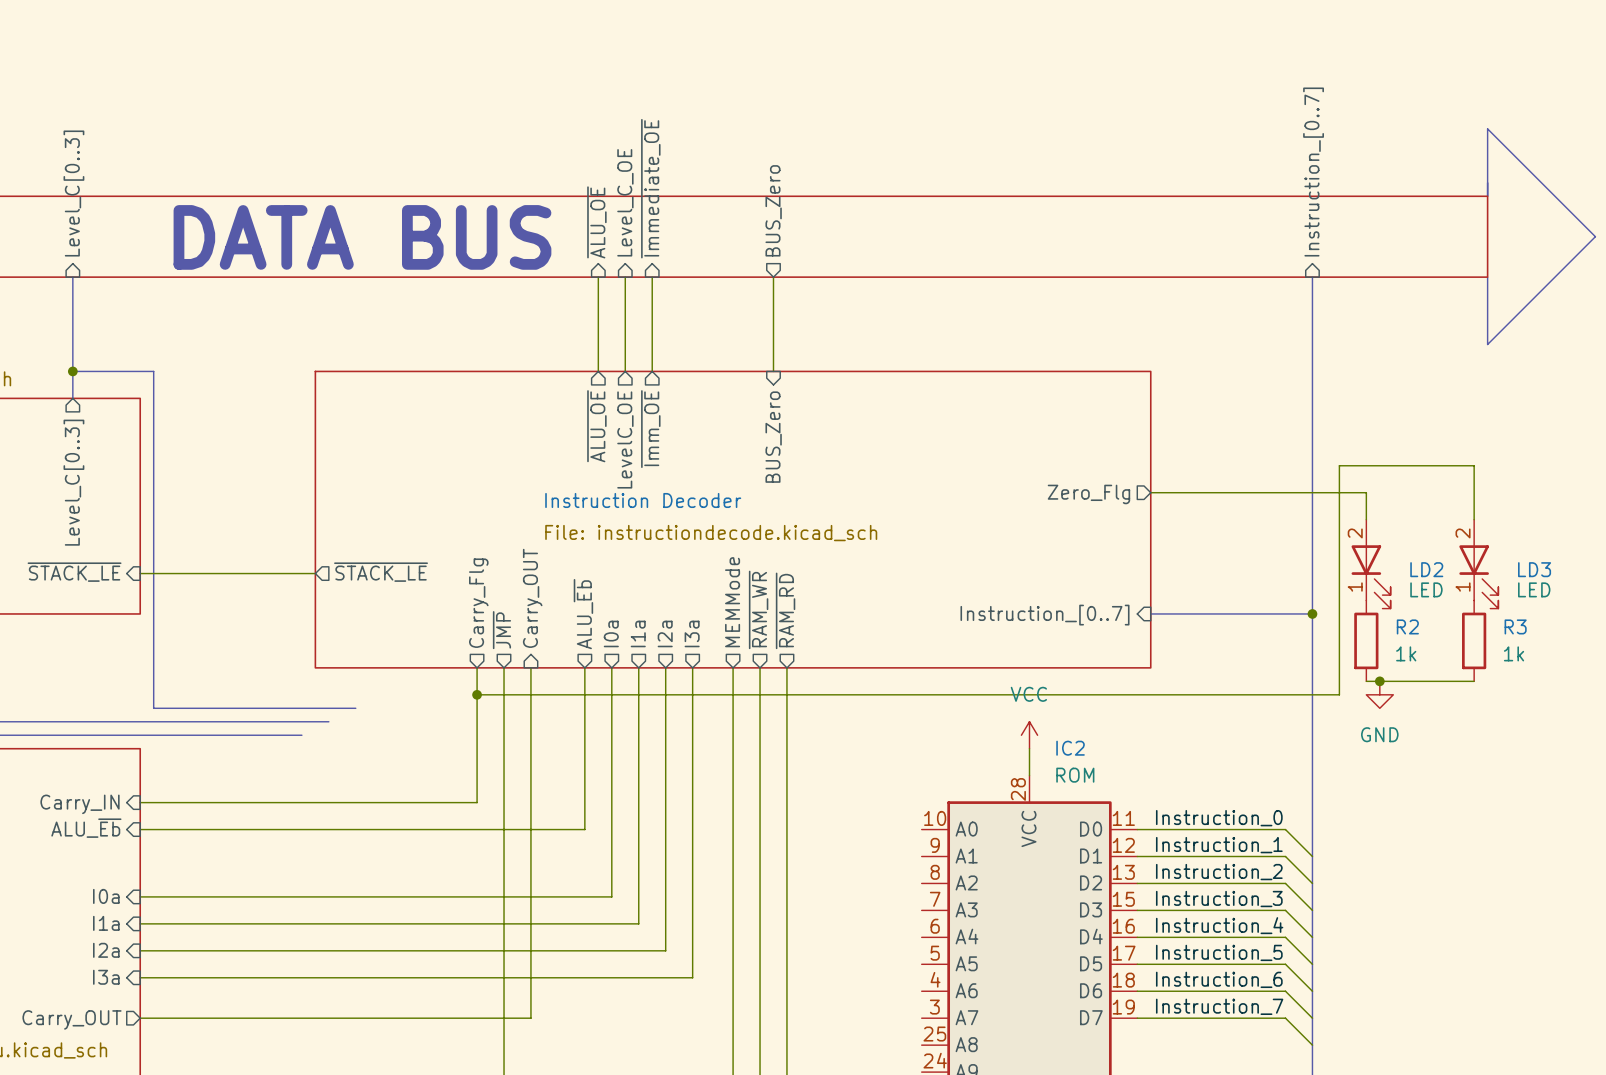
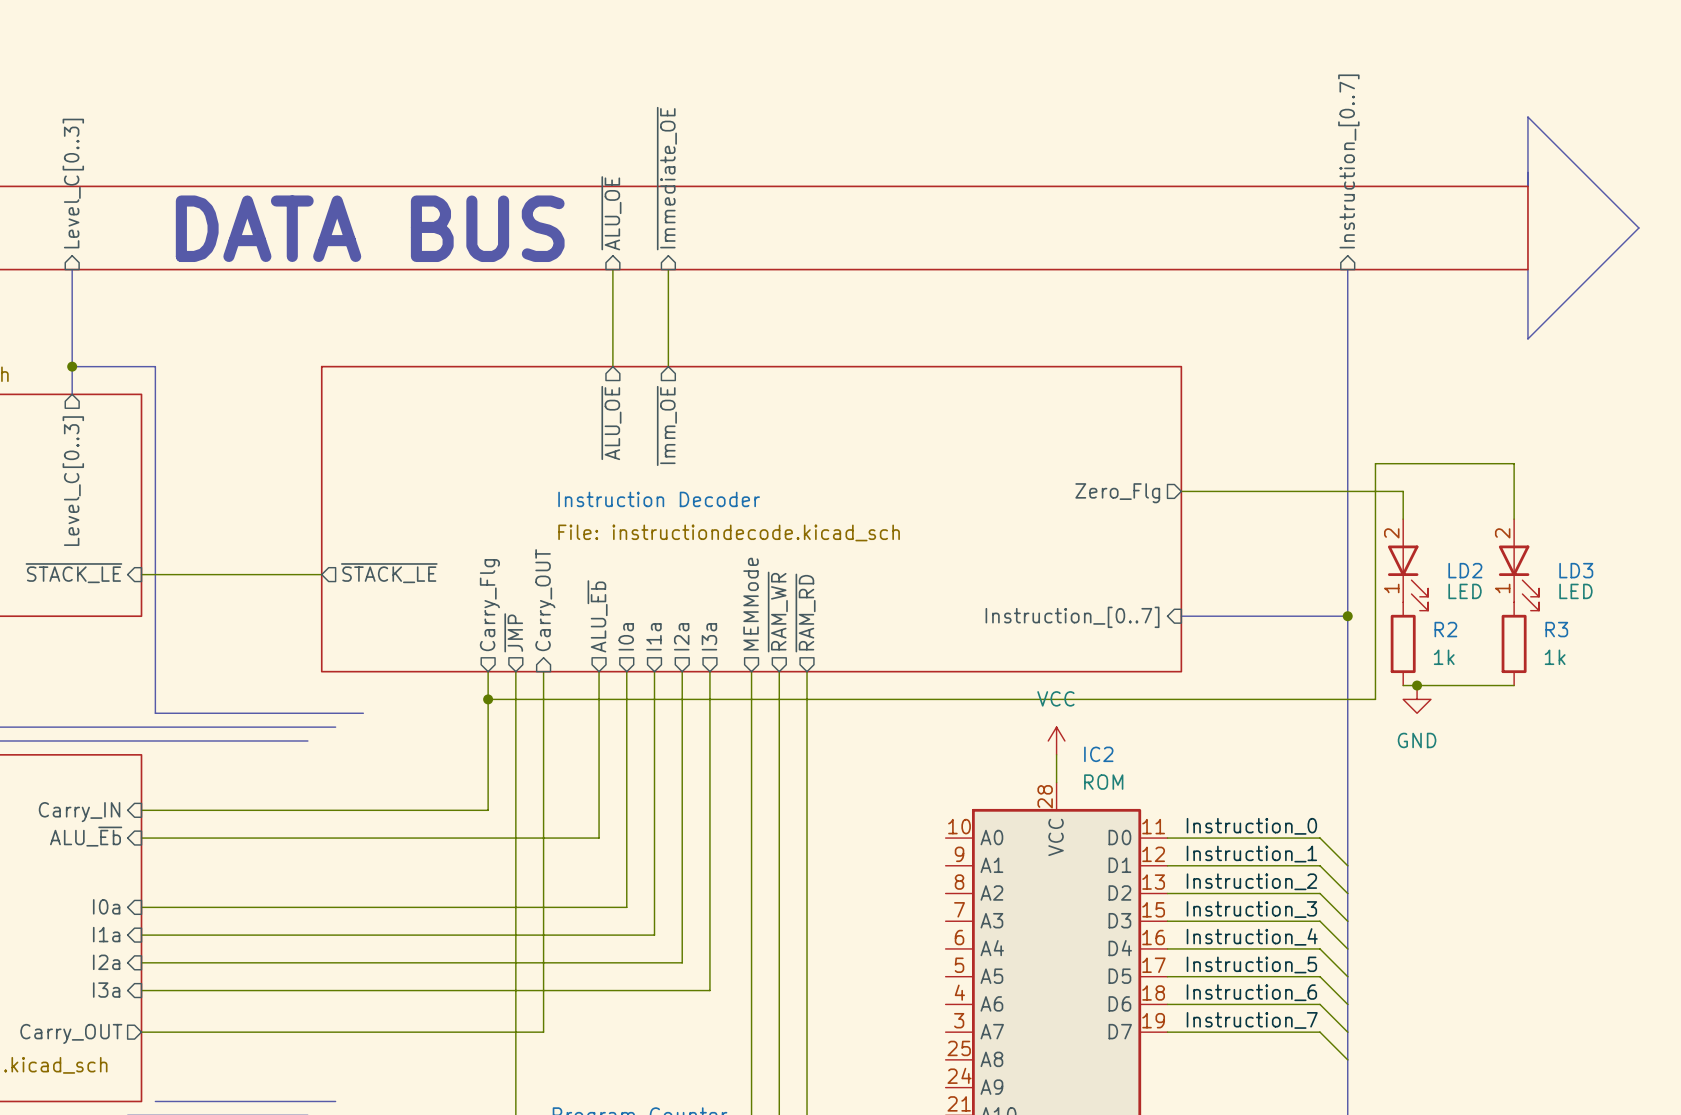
sheet pin: Level_C_OE (625, 202) -> none
sheet pin: BUS_Zero (773, 210) -> none
wire: (625, 277) (625, 371) -> none
wire: (773, 277) (773, 371) -> none
sheet pin: BUS_Zero (773, 437) -> none
sheet pin: LevelC_OE (625, 439) -> none

